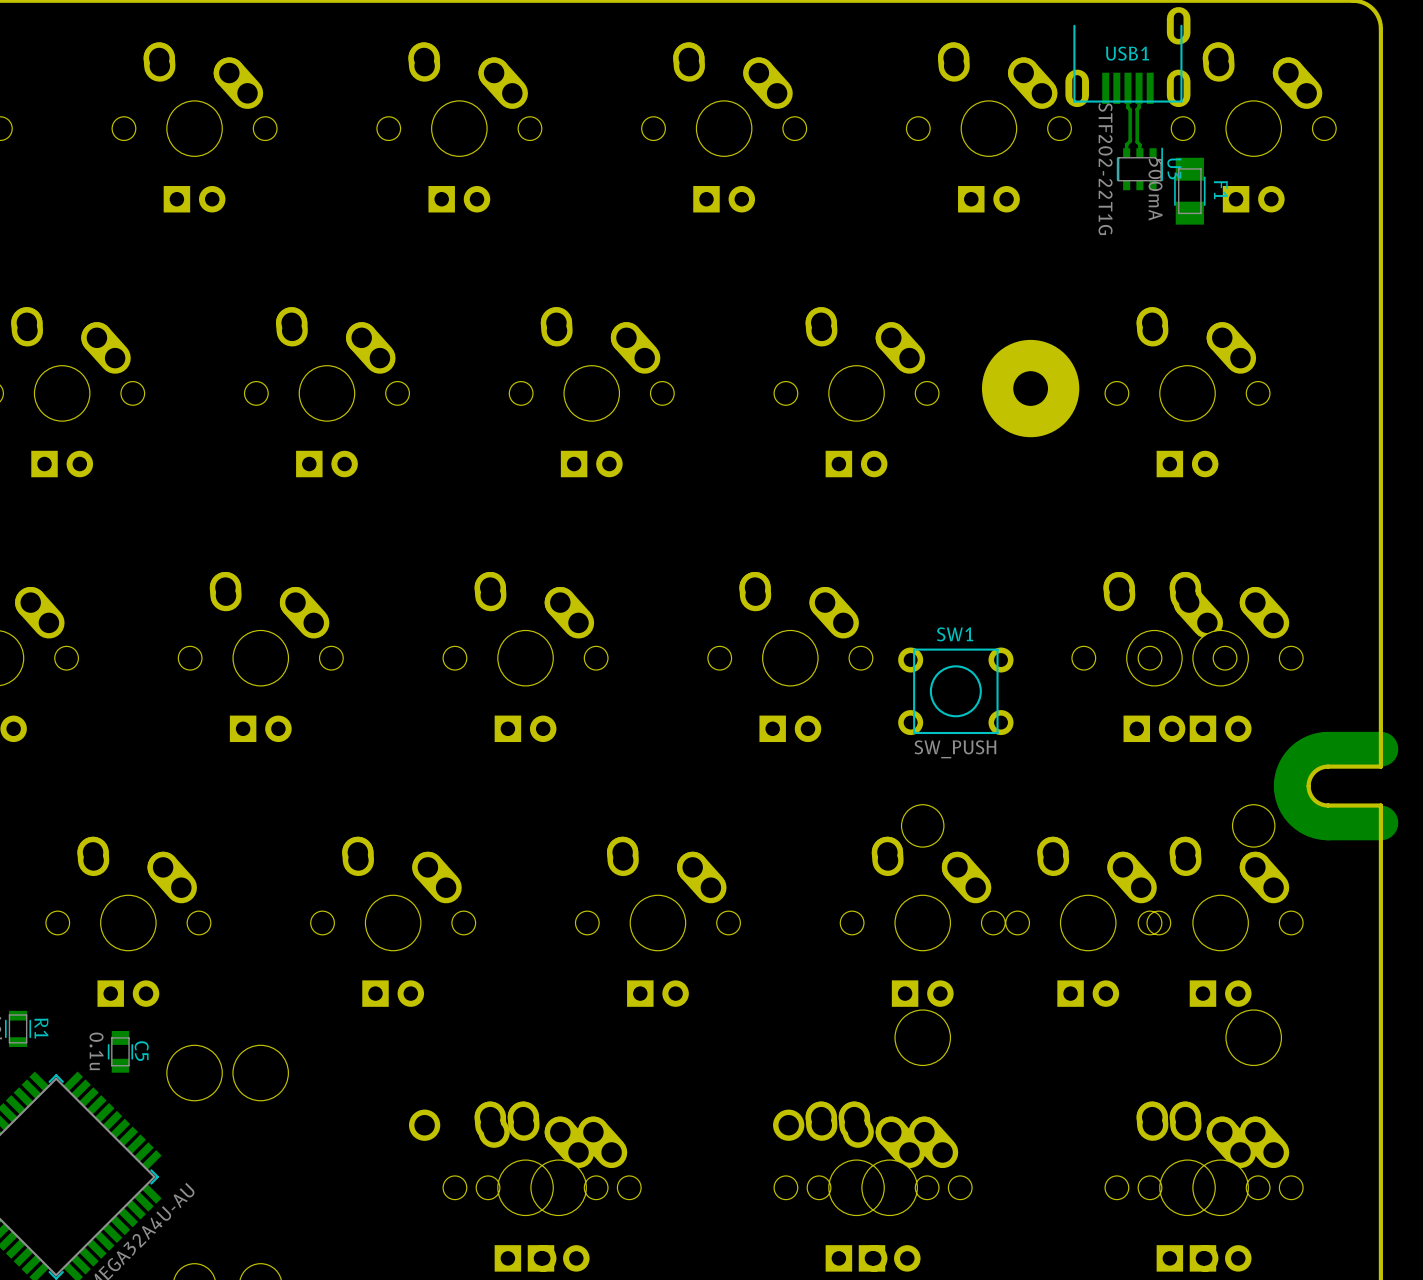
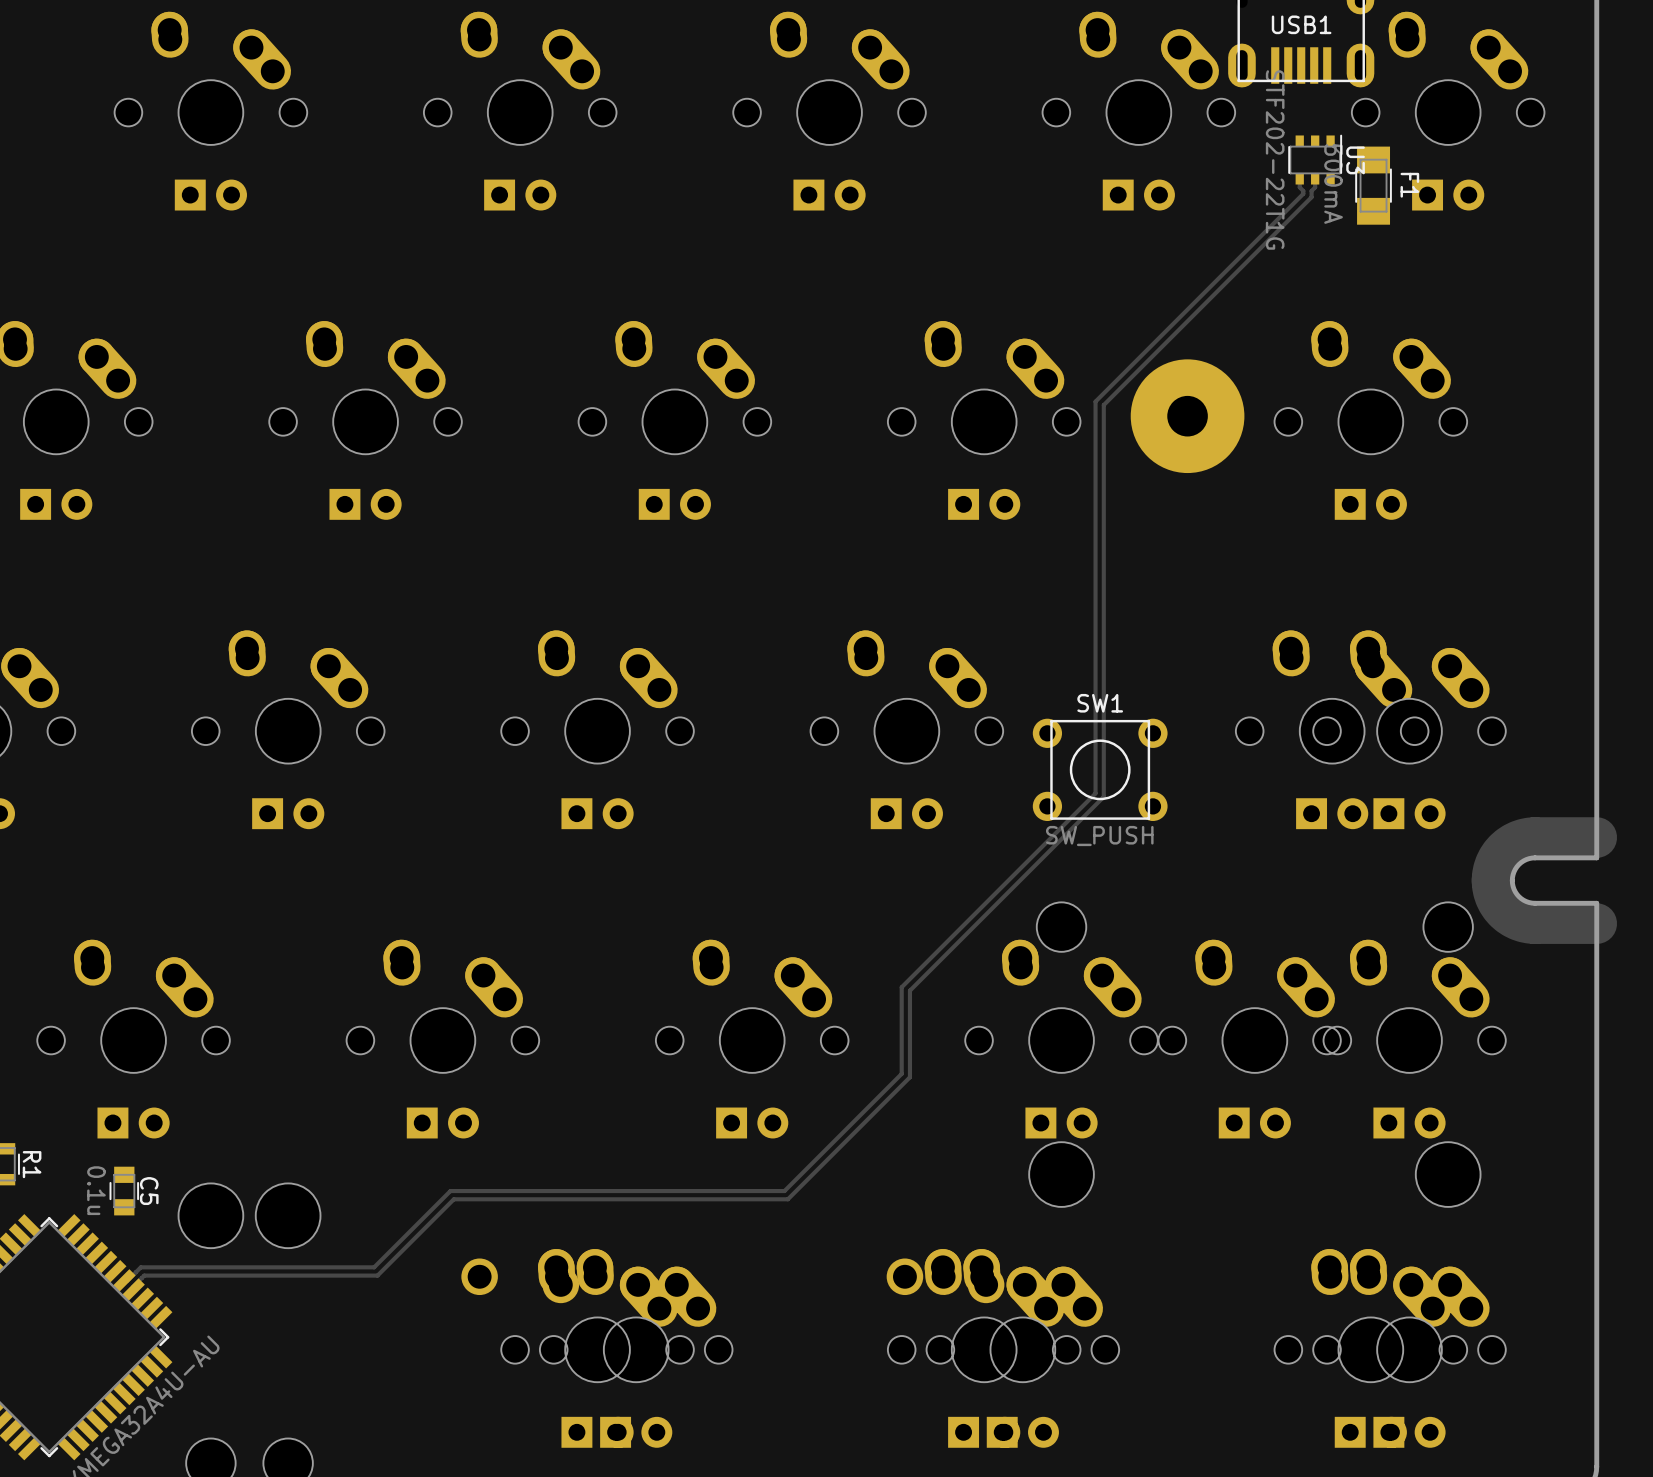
track: (1127, 88) (1130, 141) (1126, 144) (1126, 153) -> none
track: (1139, 88) (1137, 142) (1139, 144) (1139, 153) -> none
track: none -> (1299, 178) (1299, 187) (1303, 193) (1095, 401) (1095, 793) (901, 987) (901, 1073) (784, 1191) (450, 1191) (374, 1267) (140, 1267) (127, 1280) (123, 1280)
track: none -> (1315, 178) (1315, 187) (1311, 190) (1311, 197) (1103, 405) (1103, 796) (909, 990) (909, 1077) (787, 1199) (453, 1199) (377, 1275) (144, 1275) (133, 1286) (133, 1290)

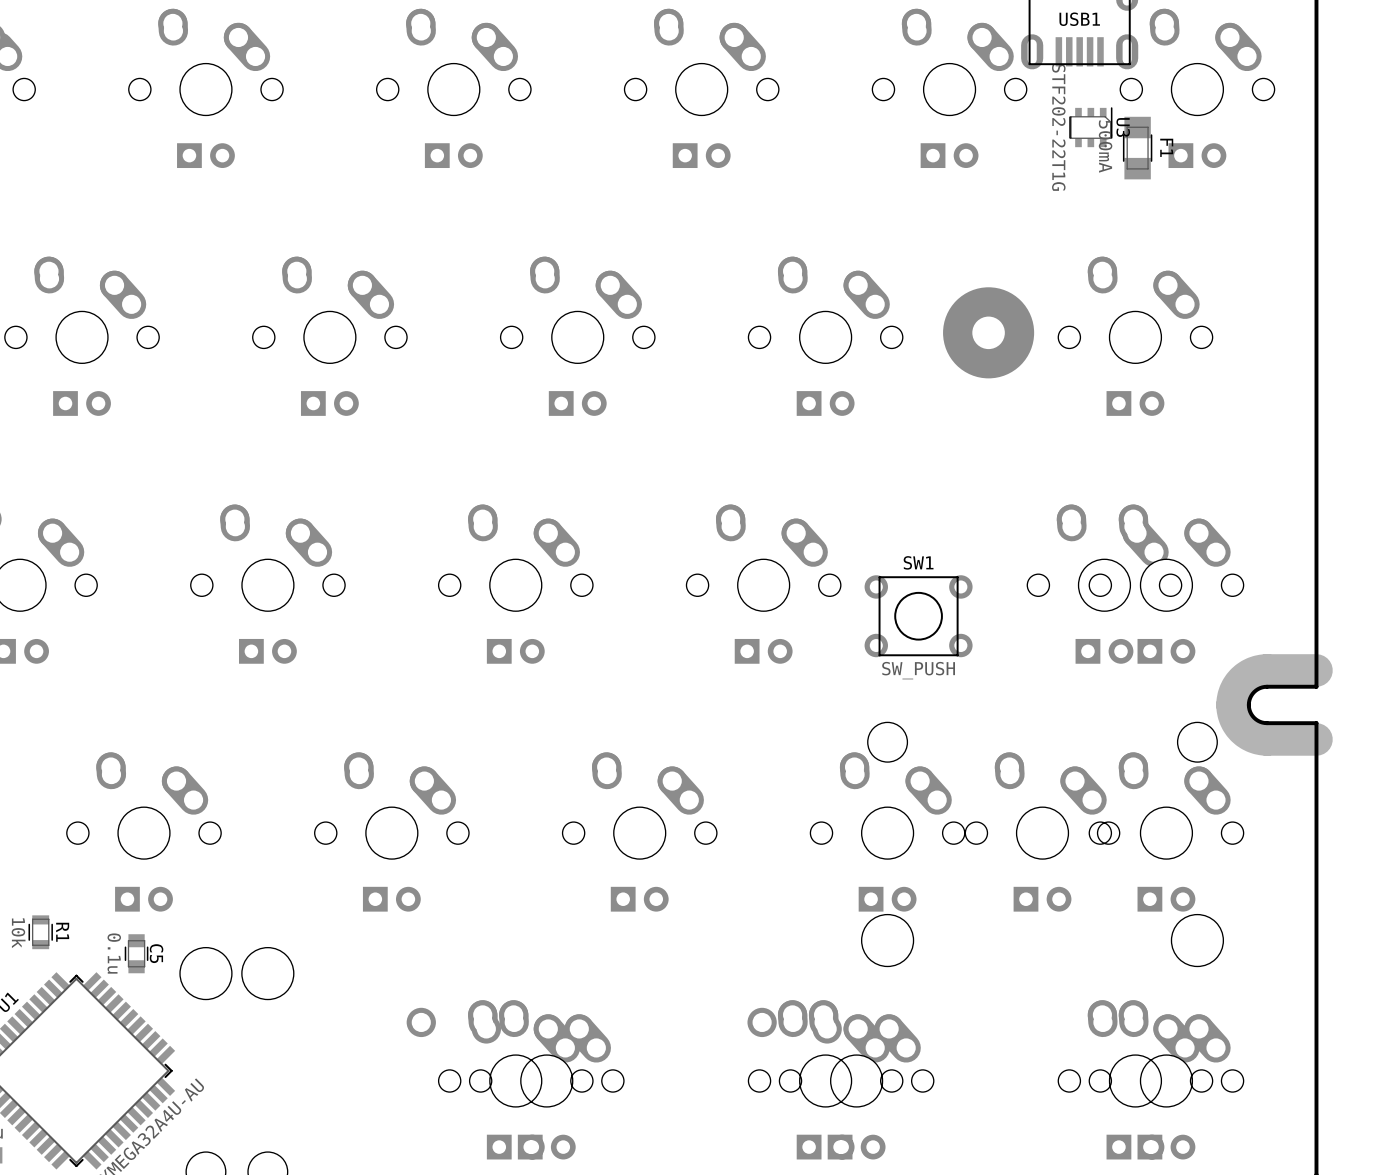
track: (1299, 178) (1299, 187) (1303, 193) (1095, 401) (1095, 793) (901, 987) (901, 1073) (784, 1191) (450, 1191) (374, 1267) (140, 1267) (127, 1280) (123, 1280) -> none
track: (1315, 178) (1315, 187) (1311, 190) (1311, 197) (1103, 405) (1103, 796) (909, 990) (909, 1077) (787, 1199) (453, 1199) (377, 1275) (144, 1275) (133, 1286) (133, 1290) -> none

